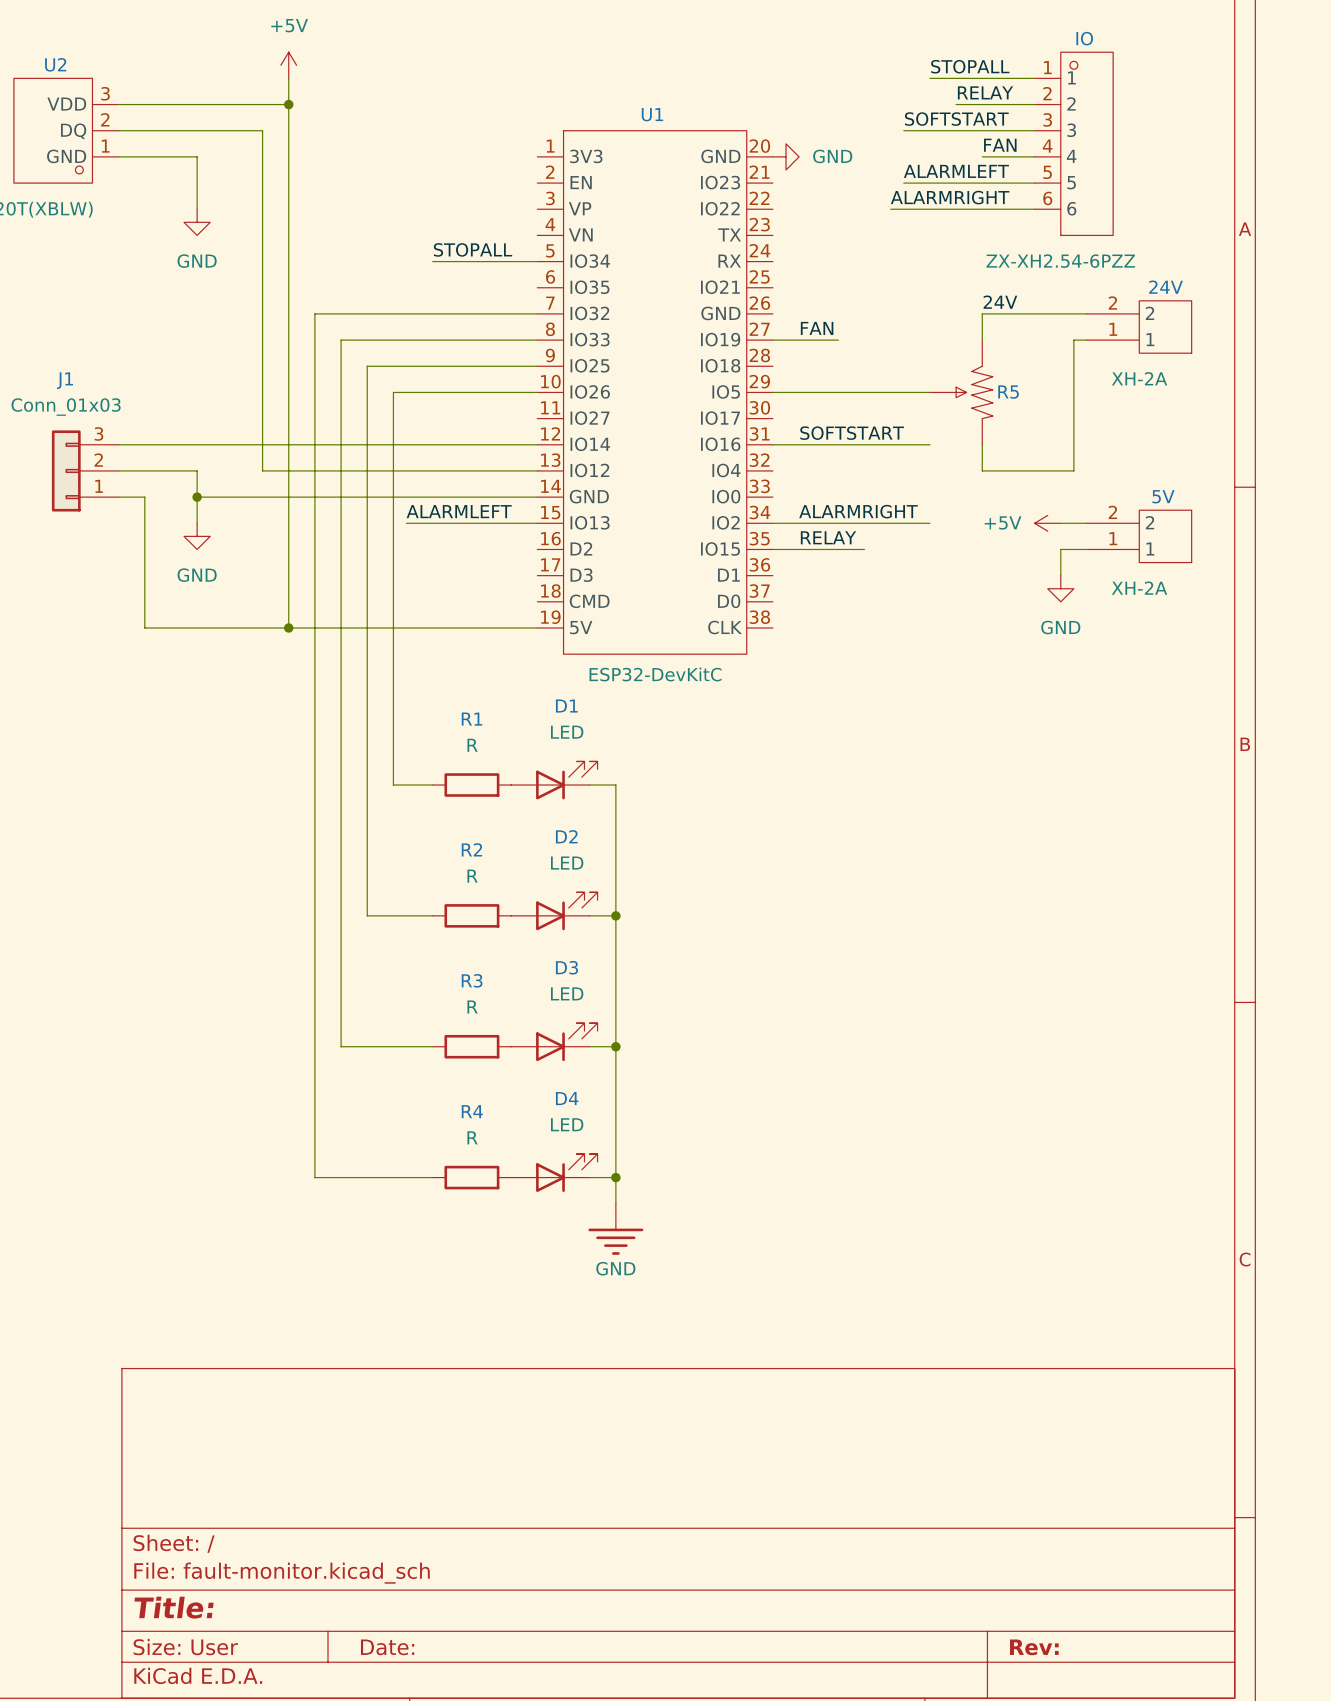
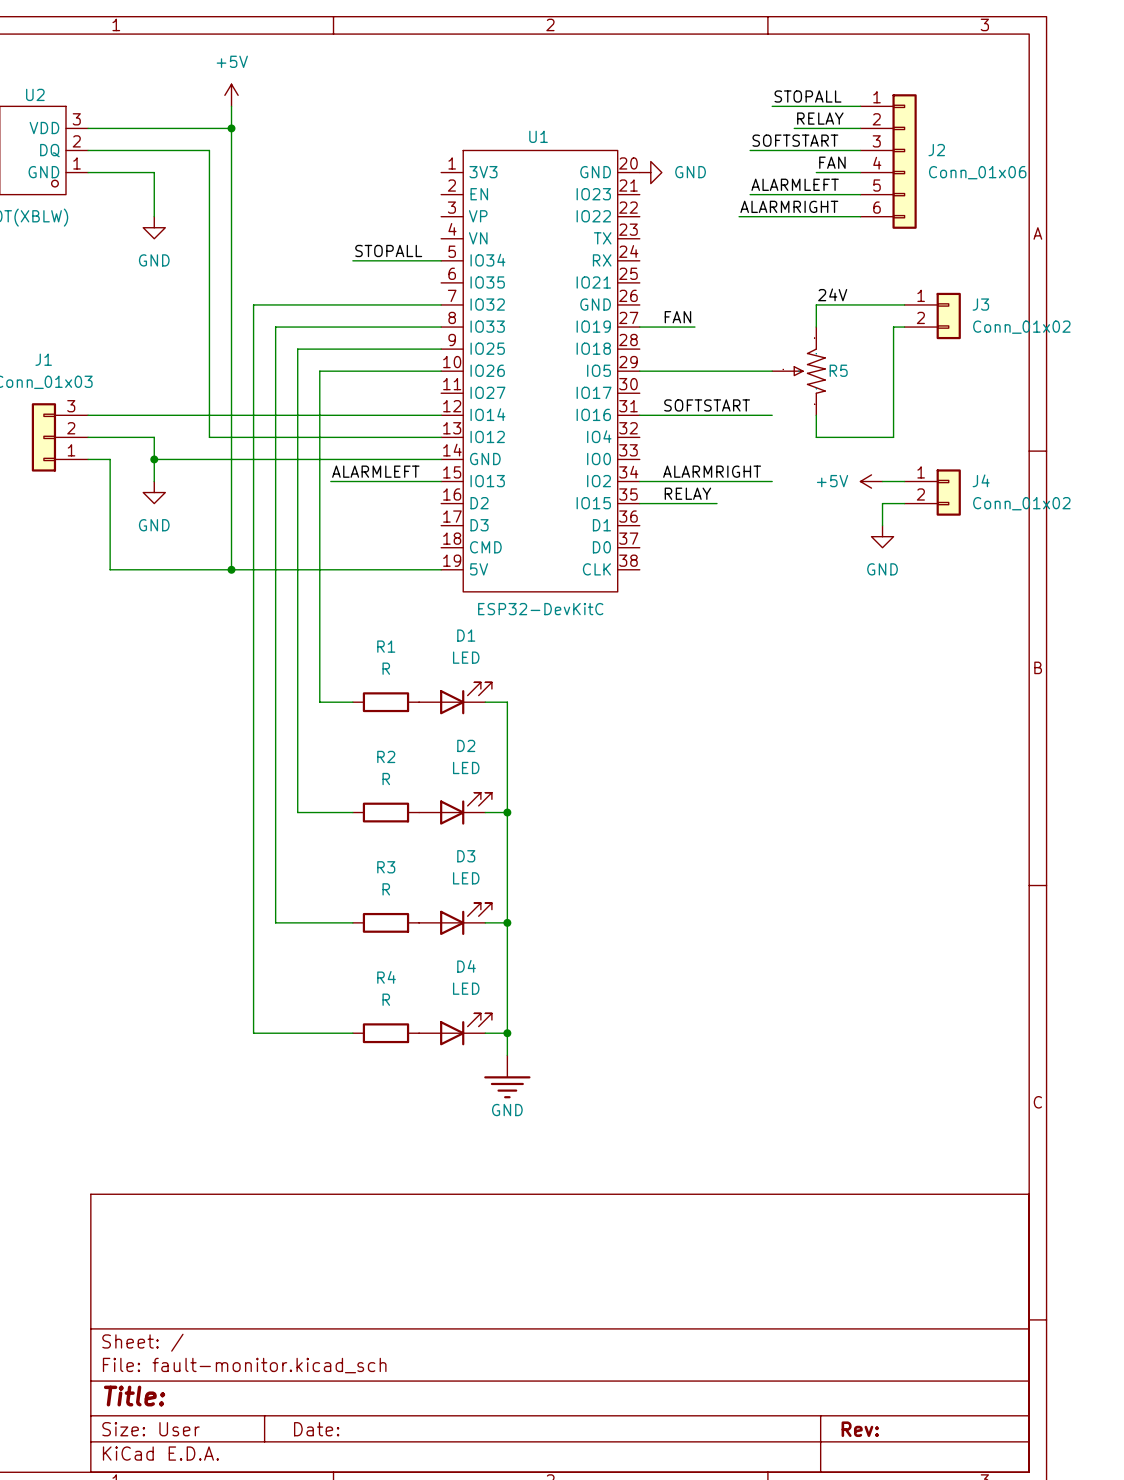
J2: none -> Conn_01x06 (888, 161)
IO: ZX-XH2.54-6PZZ (1073, 143) -> none
J3: none -> Conn_01x02 (932, 316)
24V: XH-2A (1139, 327) -> none
J4: none -> Conn_01x02 (932, 492)
5V: XH-2A (1139, 536) -> none

